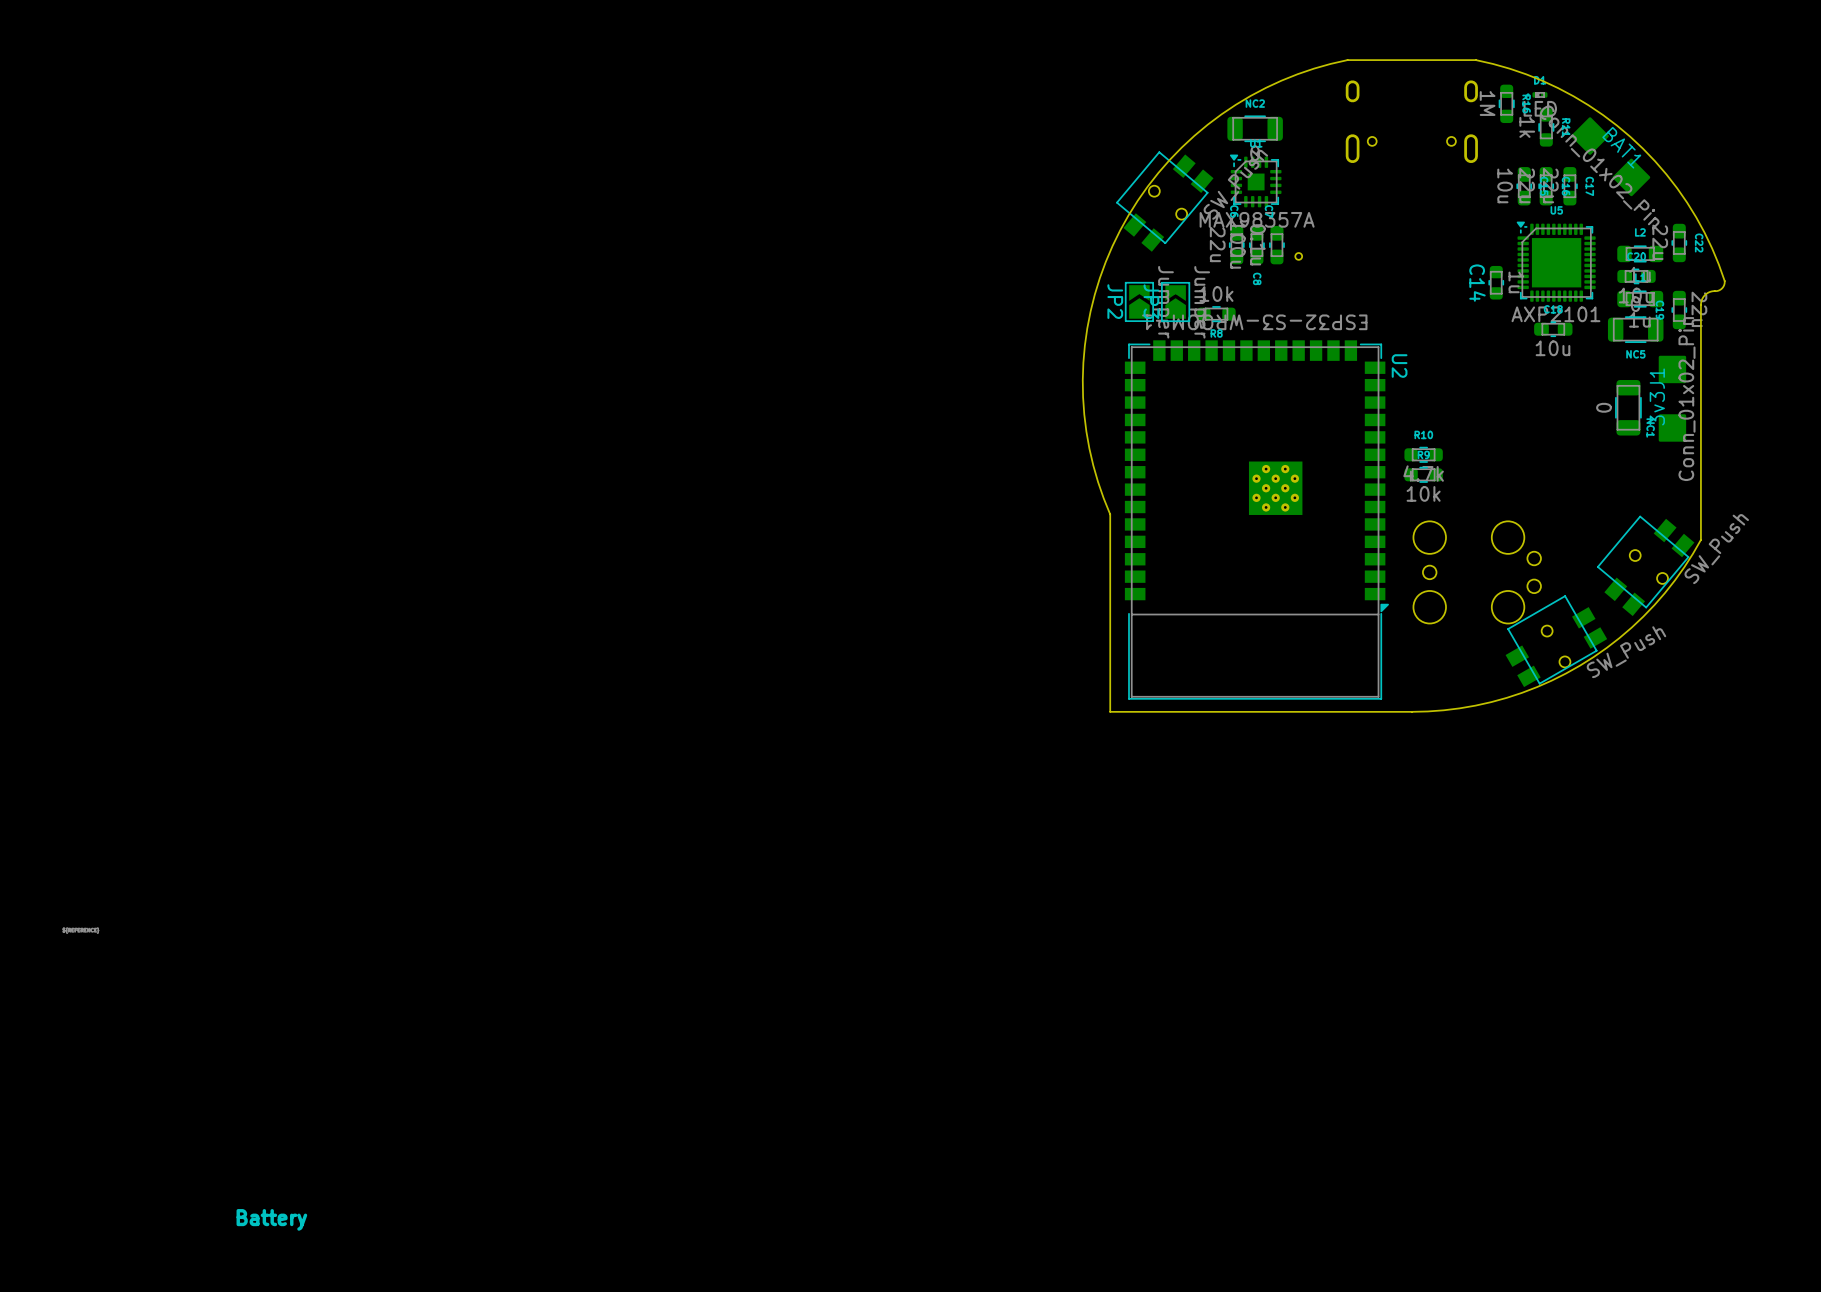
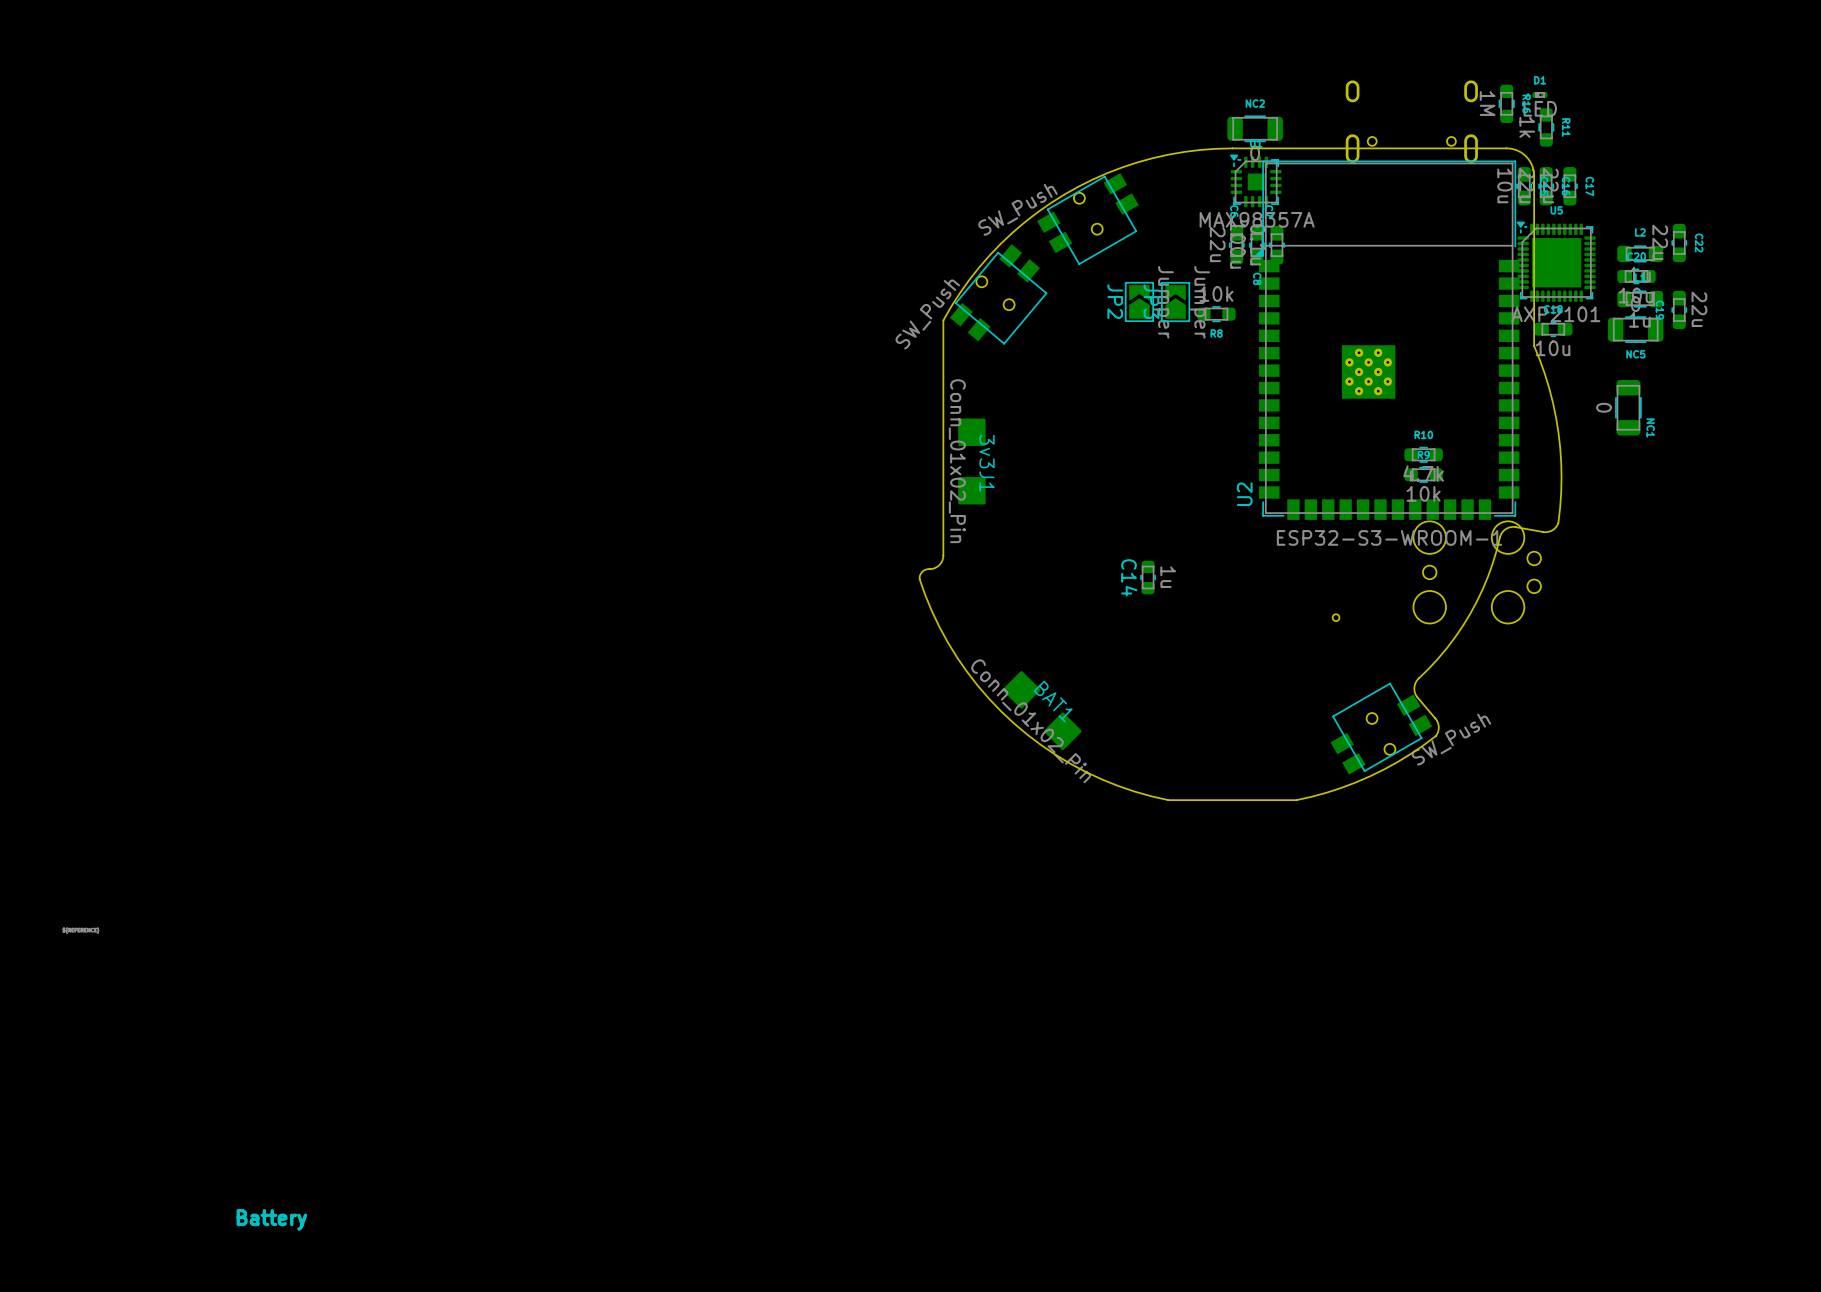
board edge: (1475, 60) (1347, 60) (1314, 68) (1281, 80) (1235, 104) (1194, 135) (1158, 173) (1128, 215) (1112, 245) (1099, 278) (1087, 328) (1083, 362) (1083, 397) (1089, 448) (1098, 482) (1110, 514) (1110, 711) (1427, 711) (1459, 708) (1506, 697) (1536, 687) (1566, 673) (1593, 657) (1619, 638) (1643, 616) (1665, 592) (1684, 567) (1700, 539) (1701, 303) (1706, 294) (1720, 289) (1724, 282) (1712, 248) (1696, 217) (1677, 188) (1643, 148) (1616, 125) (1588, 105) (1542, 80) (1509, 68) (1475, 60) -> none
BAT1 position: (1610, 156) -> (1042, 710)
part rotation: 0° (1164, 201) -> 180° (998, 294)
part position: (1164, 201) -> (998, 294)
part: none -> SW_Push (1087, 219)
part: (1298, 256) -> none
C14 position: (1496, 282) -> (1148, 577)
3v3J1 name rotation: 0° (1657, 396) -> 180° (987, 463)
3v3J1 position: (1672, 398) -> (971, 461)
3v3J1 value rotation: 0° (1686, 399) -> 180° (957, 461)
U2 rotation: 0° (1256, 519) -> 180° (1387, 340)
U2 position: (1256, 519) -> (1387, 340)
part: SW_Push (1645, 565) -> none
part: none -> (1336, 617)
part position: (1556, 641) -> (1381, 728)
board edge: none -> (1296, 800) (1341, 787) (1370, 776) (1397, 762) (1435, 736) (1438, 730) (1437, 722) (1415, 695) (1414, 688) (1415, 682) (1446, 648) (1470, 613) (1487, 576) (1503, 531) (1514, 526) (1547, 531) (1553, 529) (1558, 523) (1561, 477) (1558, 432) (1549, 388) (1534, 345) (1533, 172) (1528, 158) (1515, 149) (1506, 148) (1216, 148) (1168, 154) (1137, 162) (1107, 173) (1078, 186) (1050, 203) (1024, 222) (1001, 243) (979, 267) (960, 292) (943, 320) (943, 556) (936, 567) (922, 571) (919, 579) (939, 627) (967, 671) (1001, 711) (1027, 734) (1070, 763) (1118, 785) (1168, 800) (1296, 800)

